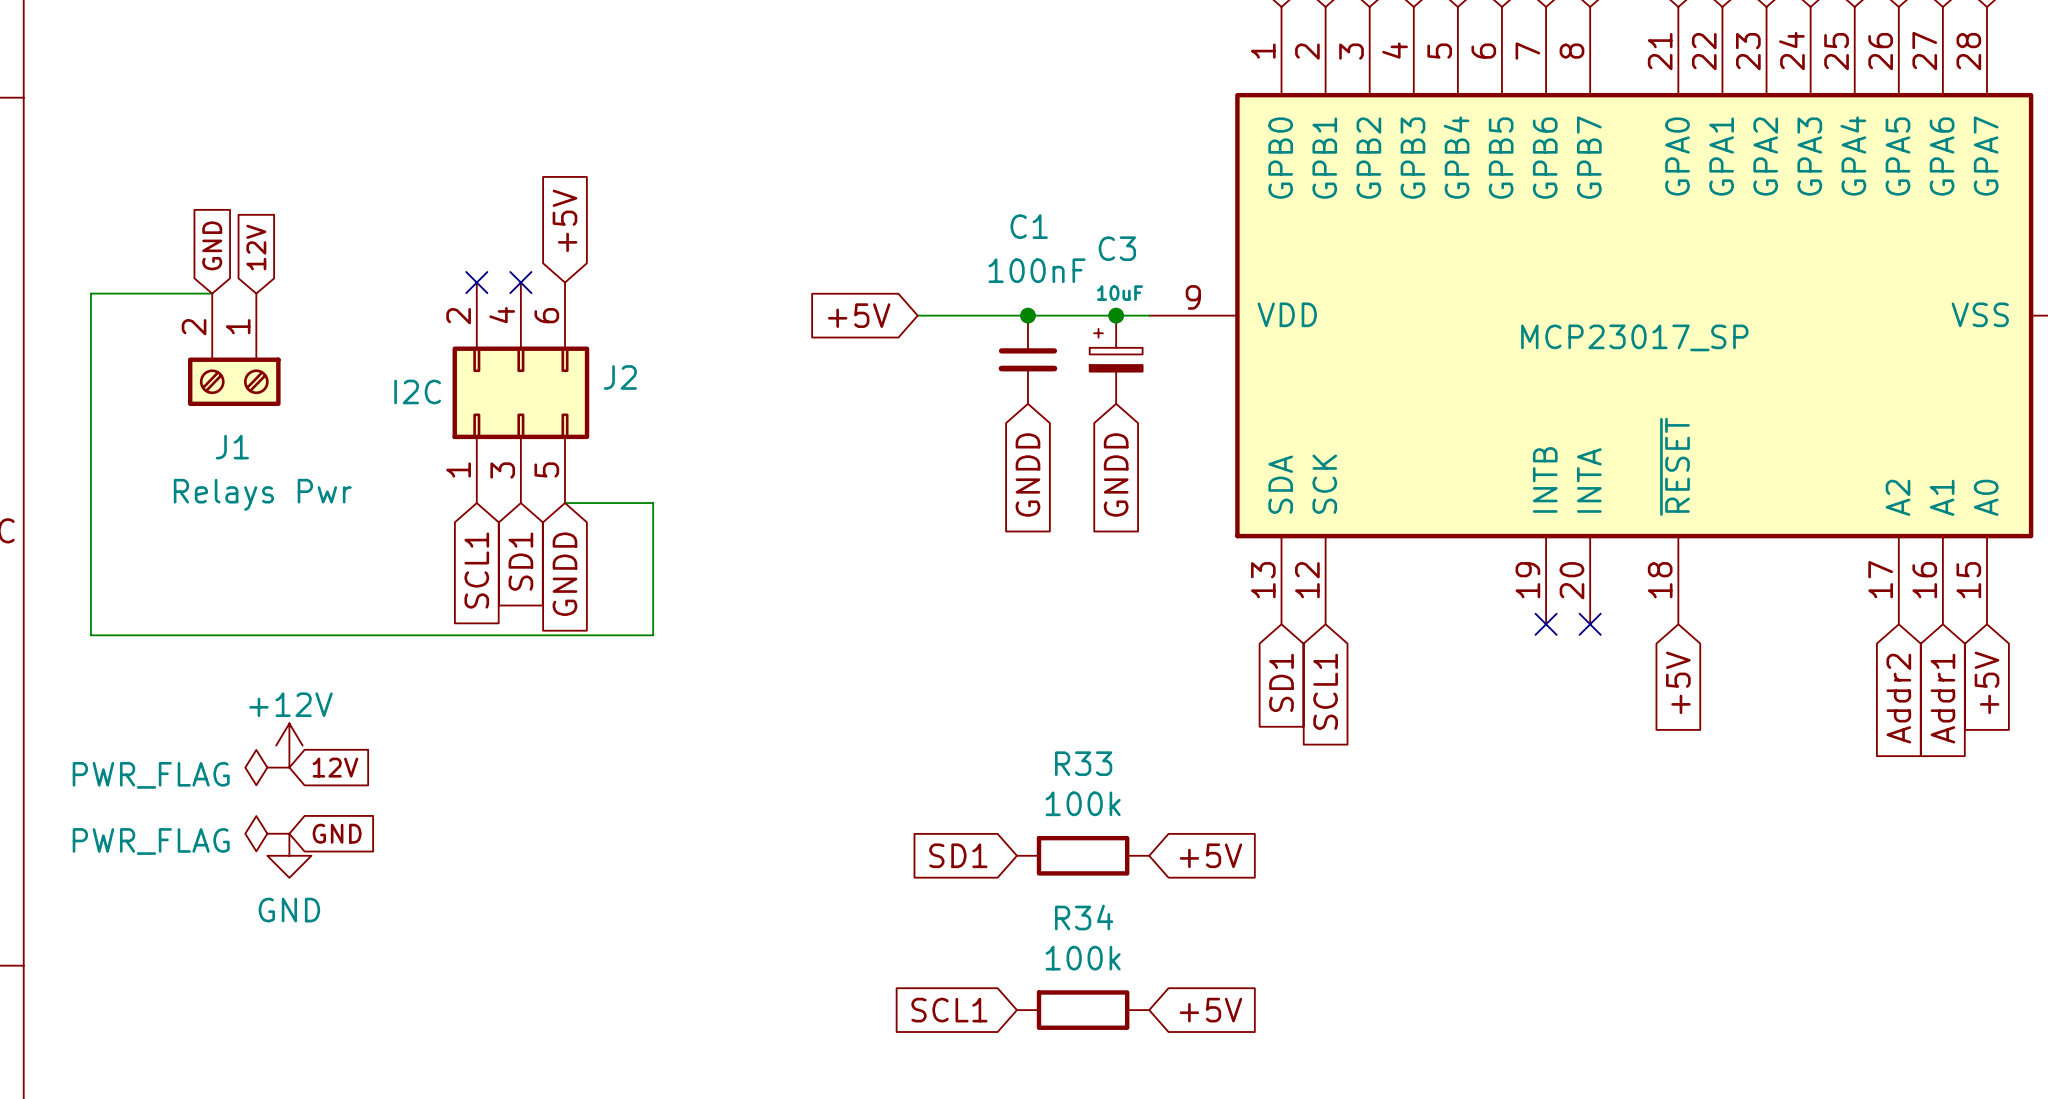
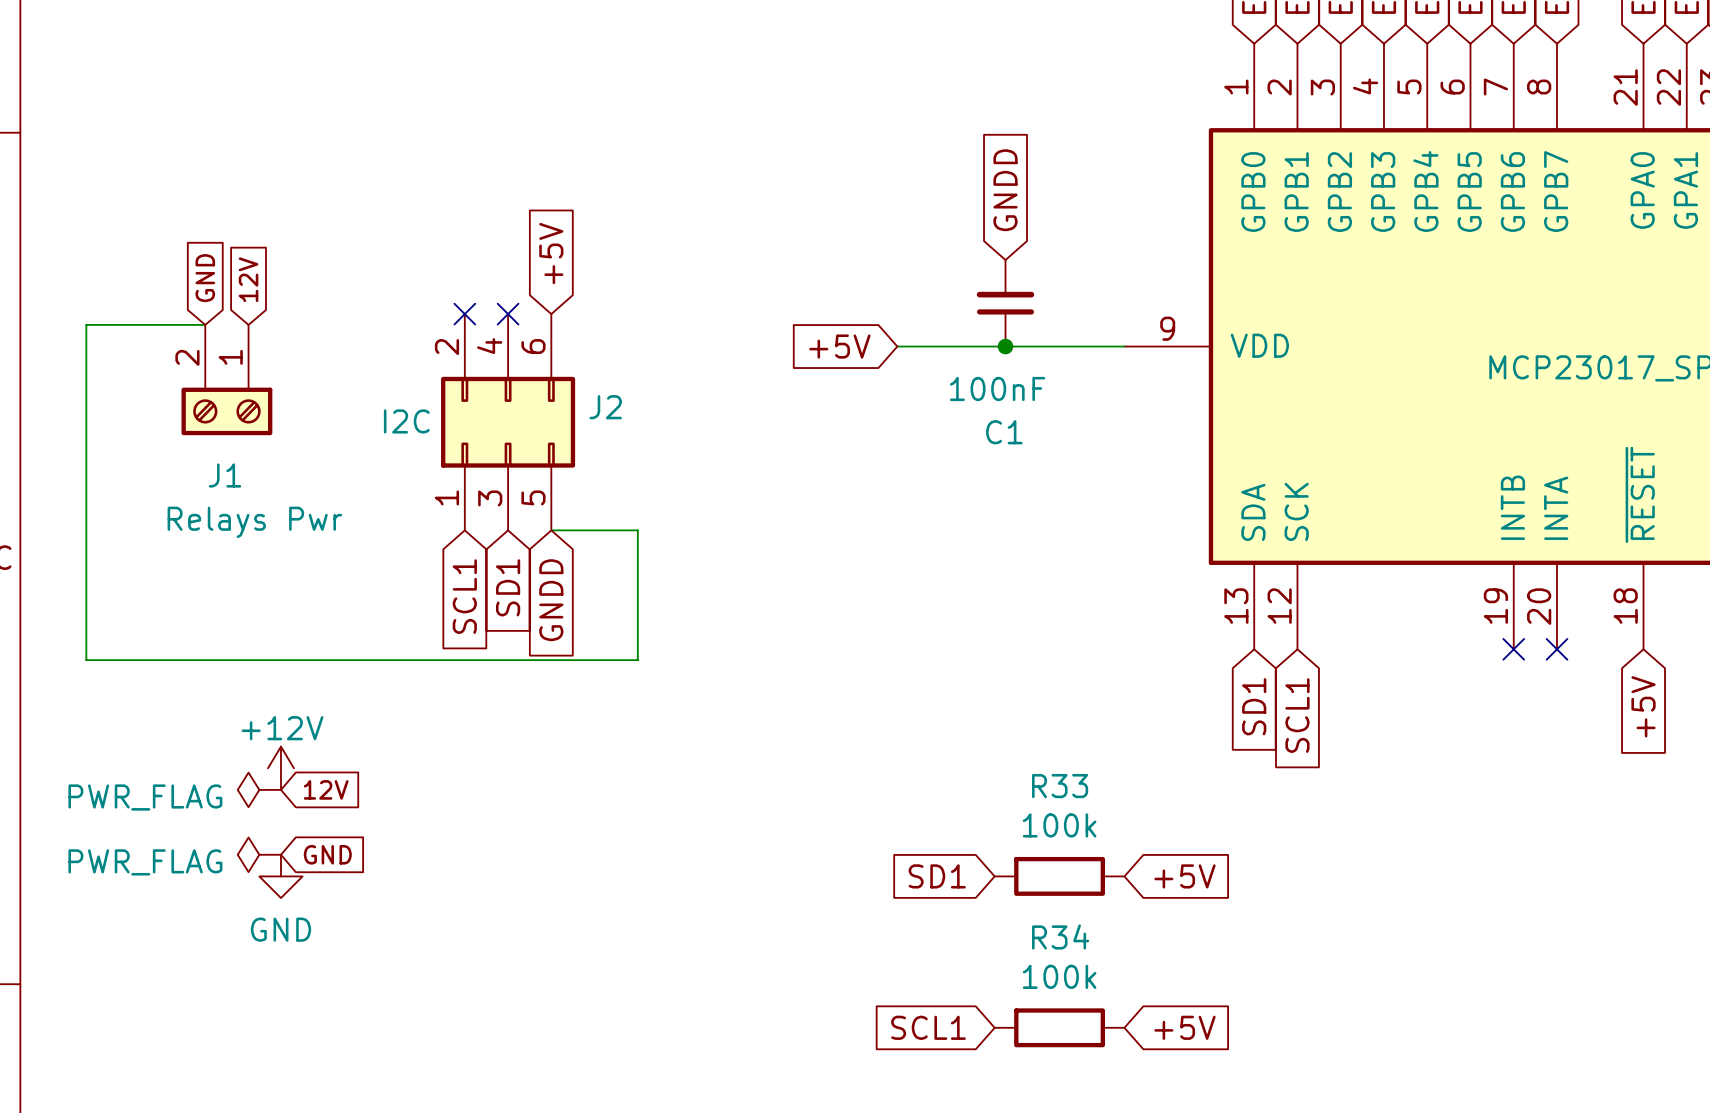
global label: none -> GNDD (1005, 190)
junction: (1116, 315) -> none
C1 rotation: 0° (1027, 359) -> 180° (1005, 303)
C1 position: (1027, 359) -> (1005, 303)
C3: 10uF (1116, 359) -> none
global label: GNDD (1027, 474) -> none
global label: GNDD (1116, 474) -> none

